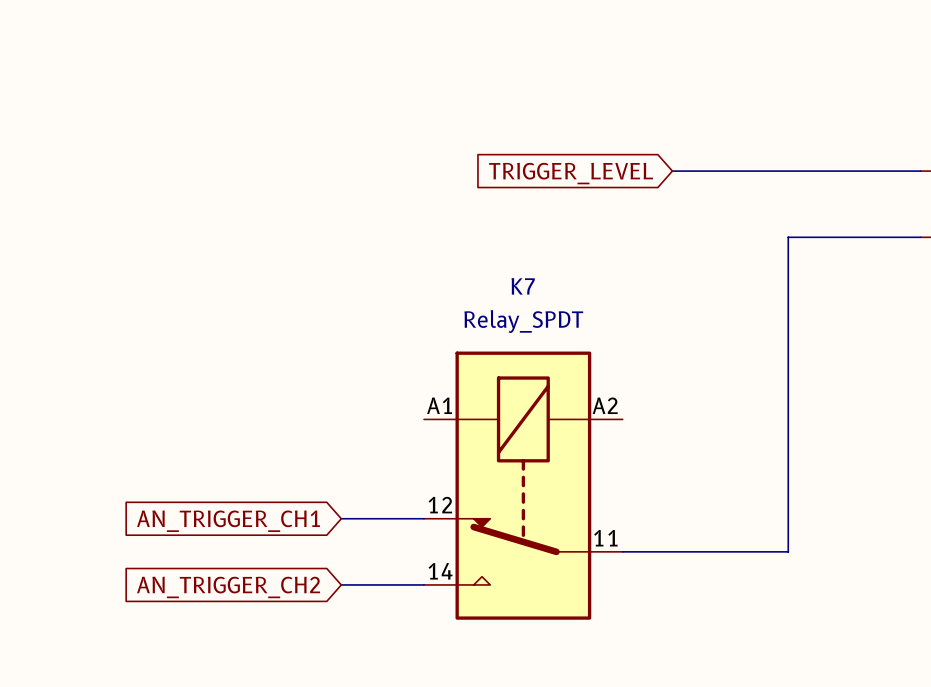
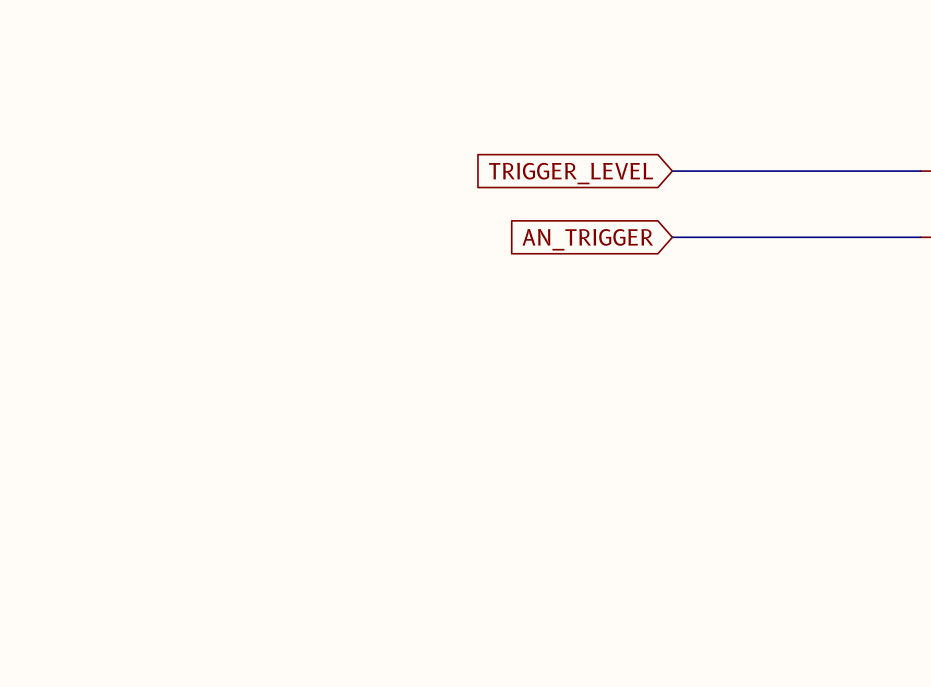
wire: (788, 237) (788, 551) (622, 551) -> (788, 237) (672, 237)
global label: none -> AN_TRIGGER (587, 239)
K7: Relay_SPDT (523, 485) -> none
wire: (341, 518) (424, 518) -> none
global label: AN_TRIGGER_CH1 (228, 521) -> none
wire: (341, 584) (424, 584) -> none
global label: AN_TRIGGER_CH2 (228, 587) -> none

